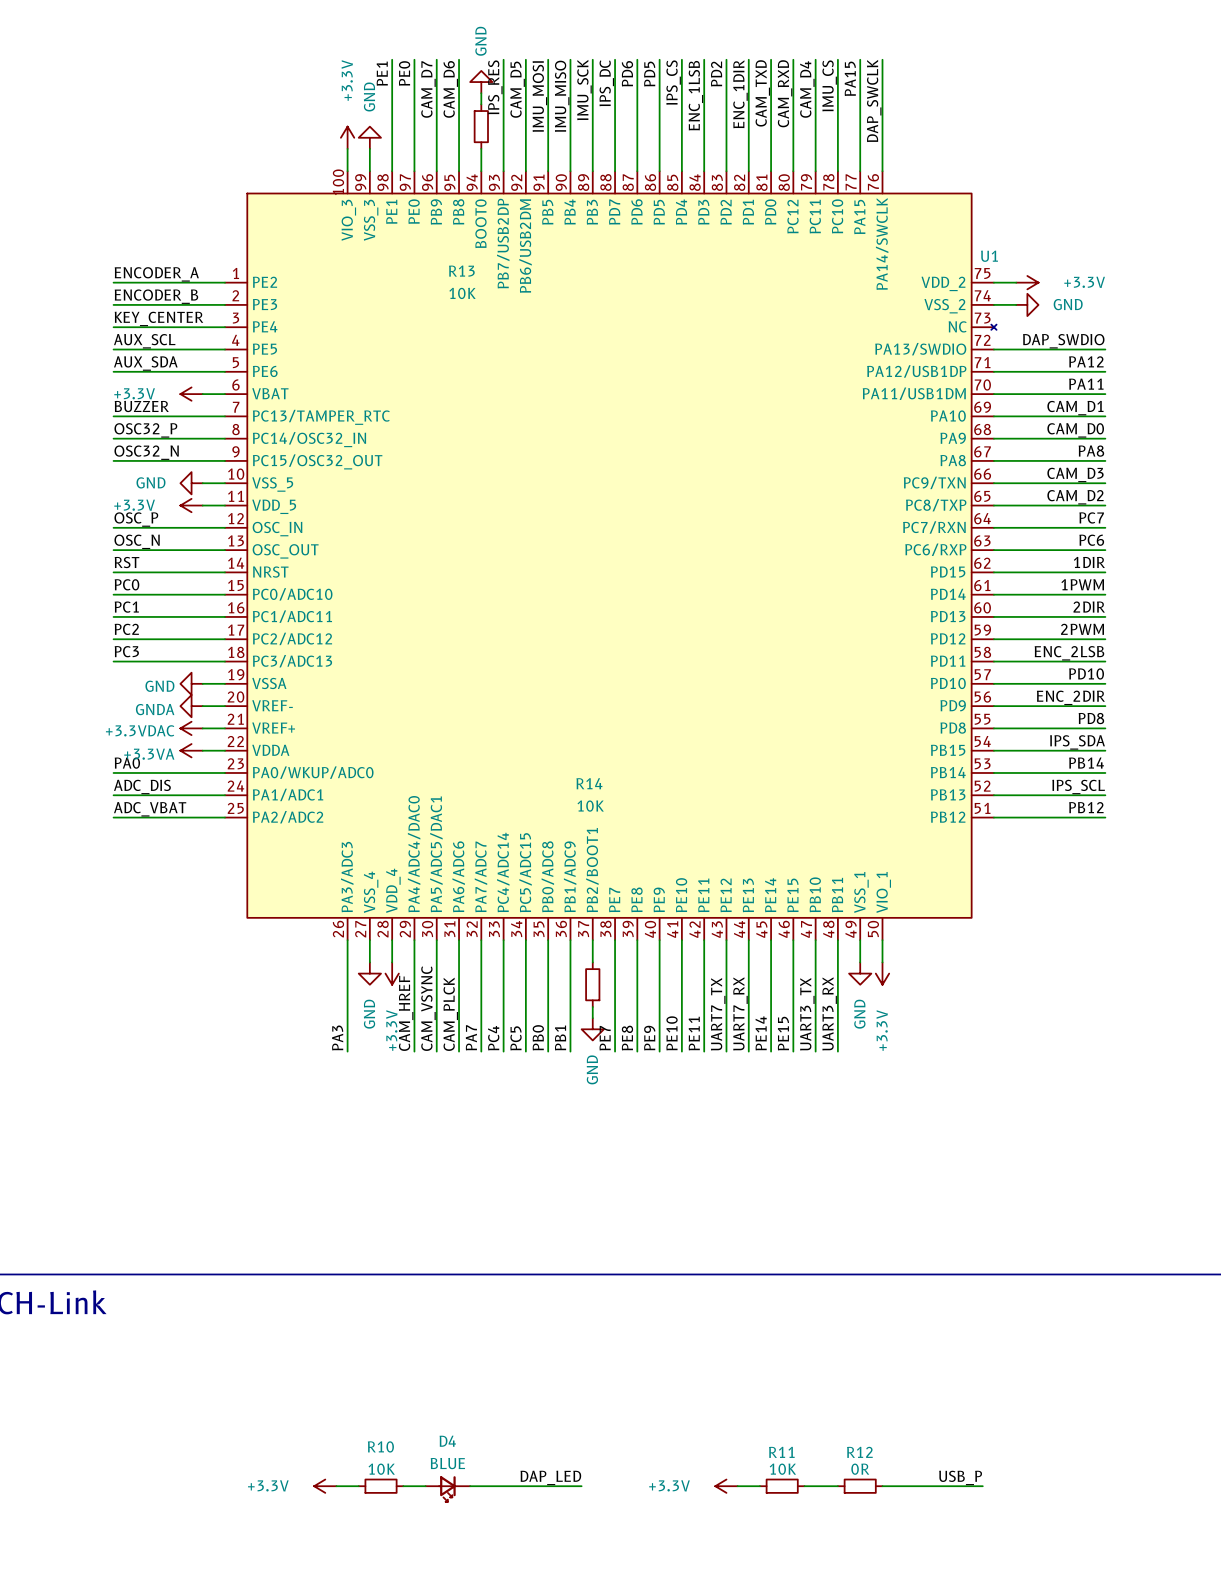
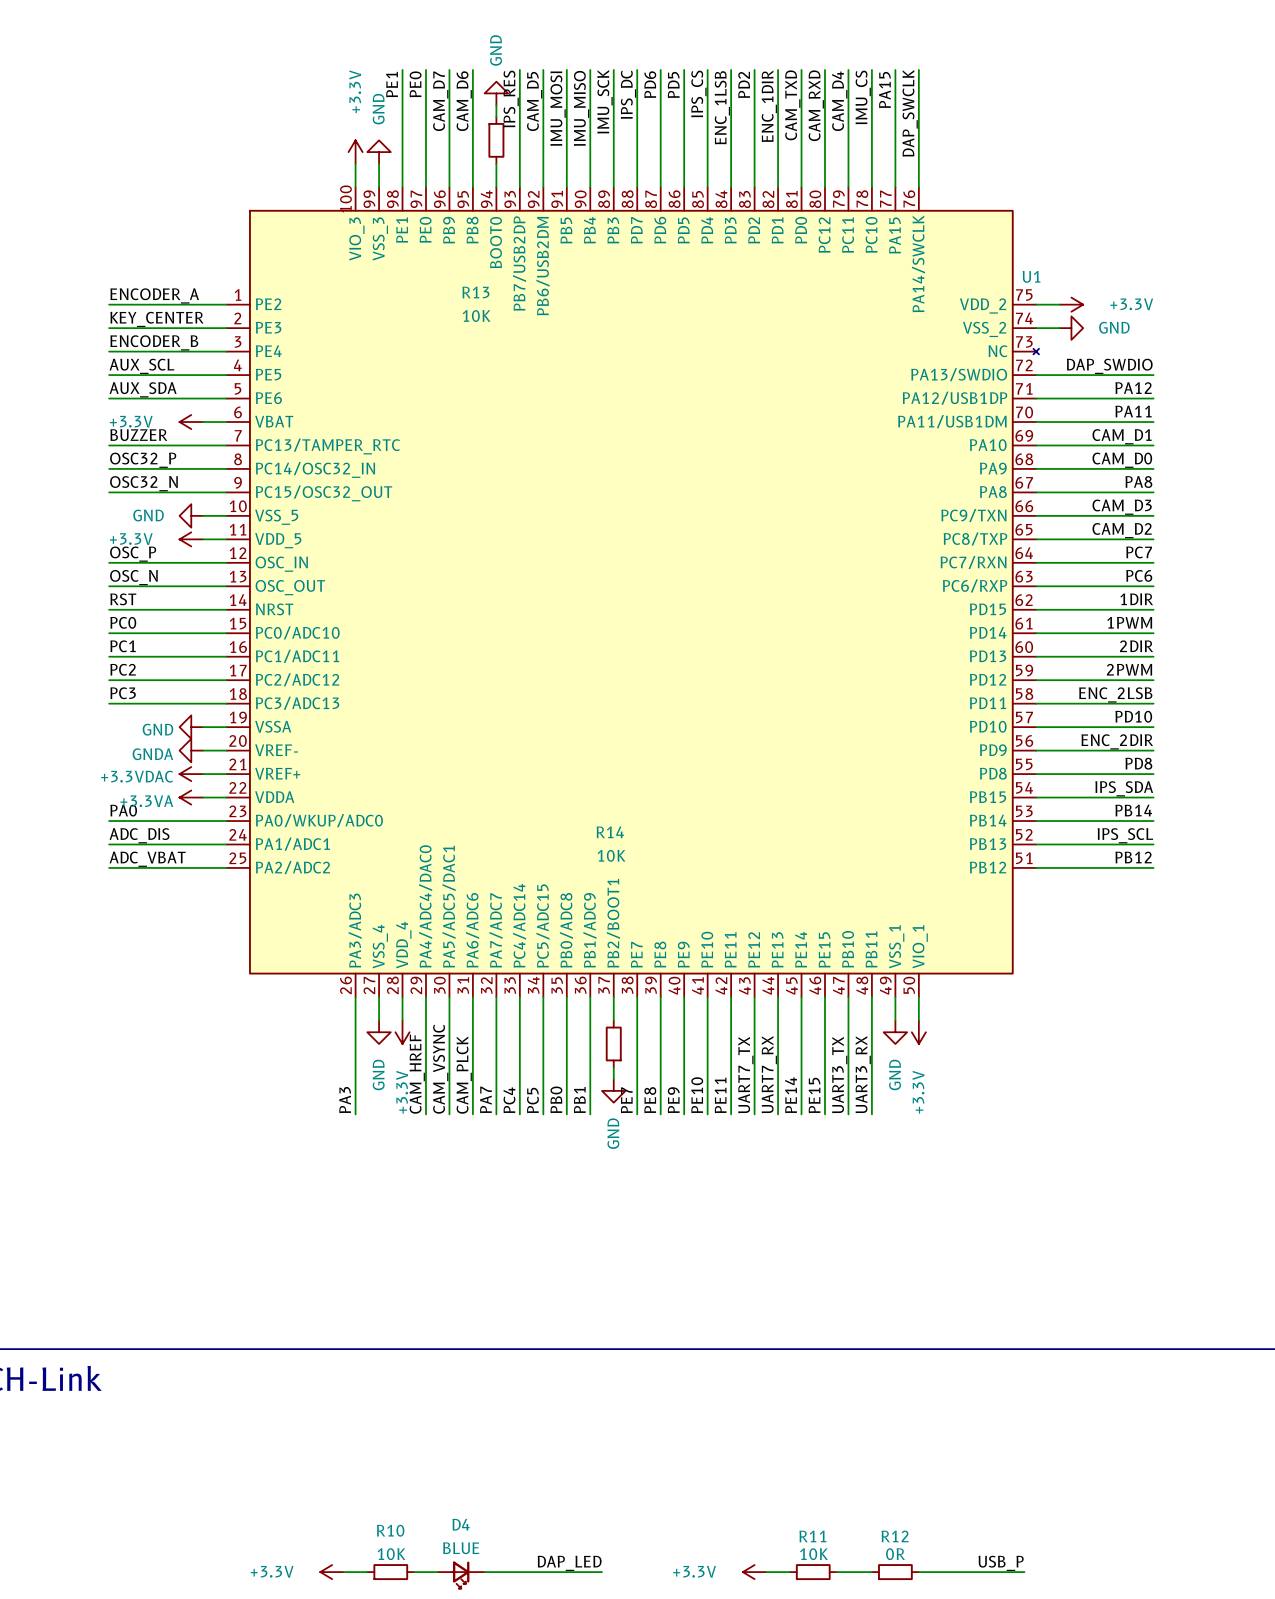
label: ENCODER_B (156, 296) -> KEY_CENTER (156, 319)
label: KEY_CENTER (158, 318) -> ENCODER_B (154, 342)

